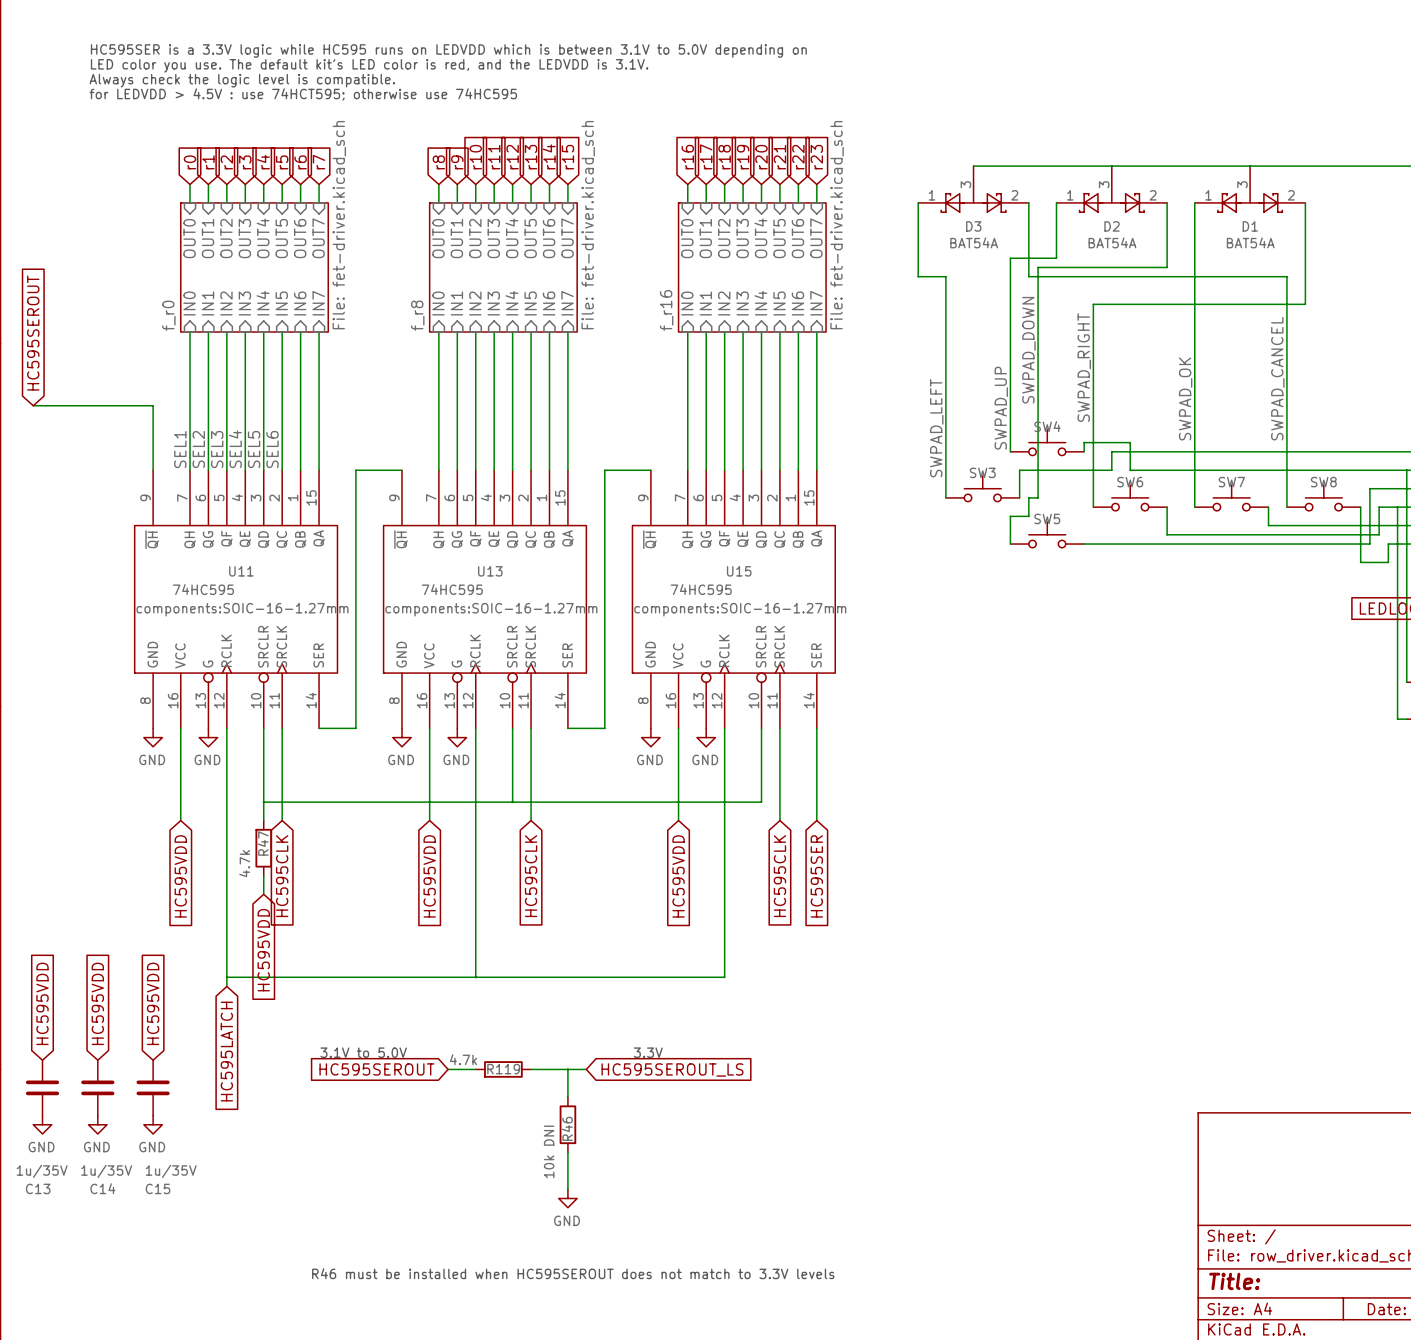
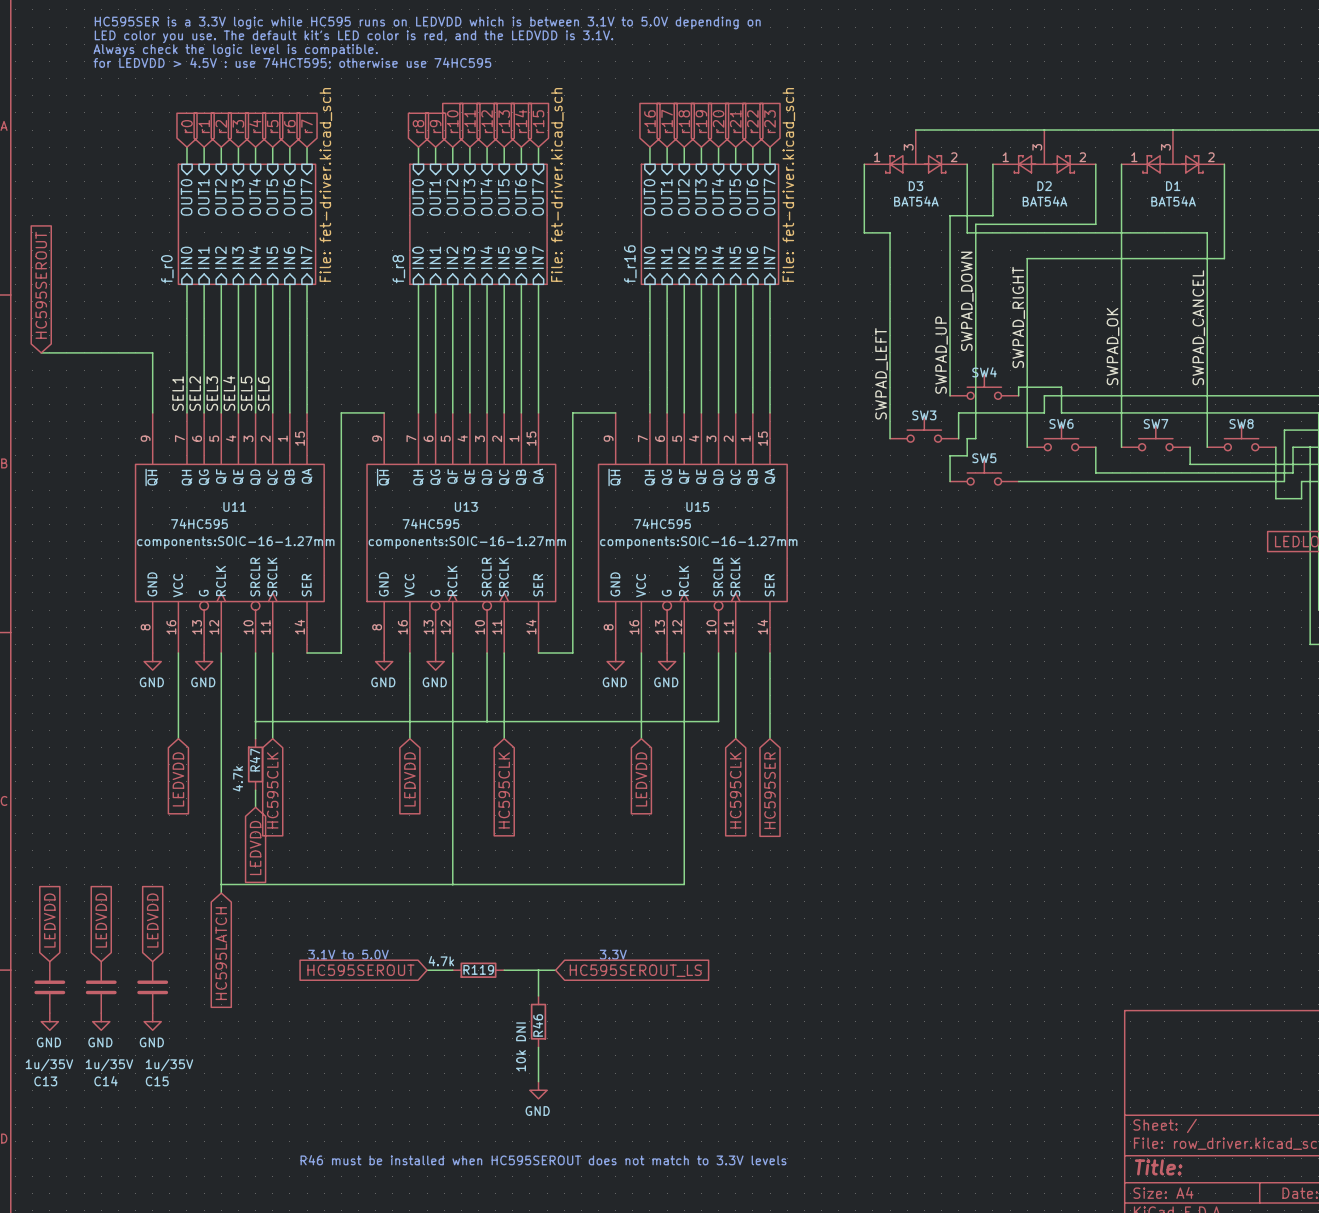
global label: HC595VDD (180, 876) -> LEDVDD (178, 779)
global label: HC595VDD (429, 876) -> LEDVDD (409, 779)
global label: HC595VDD (678, 876) -> LEDVDD (641, 779)
global label: HC595VDD (263, 950) -> LEDVDD (255, 847)
global label: HC595VDD (42, 1003) -> LEDVDD (49, 920)
global label: HC595VDD (97, 1003) -> LEDVDD (101, 920)
global label: HC595VDD (153, 1003) -> LEDVDD (152, 920)

